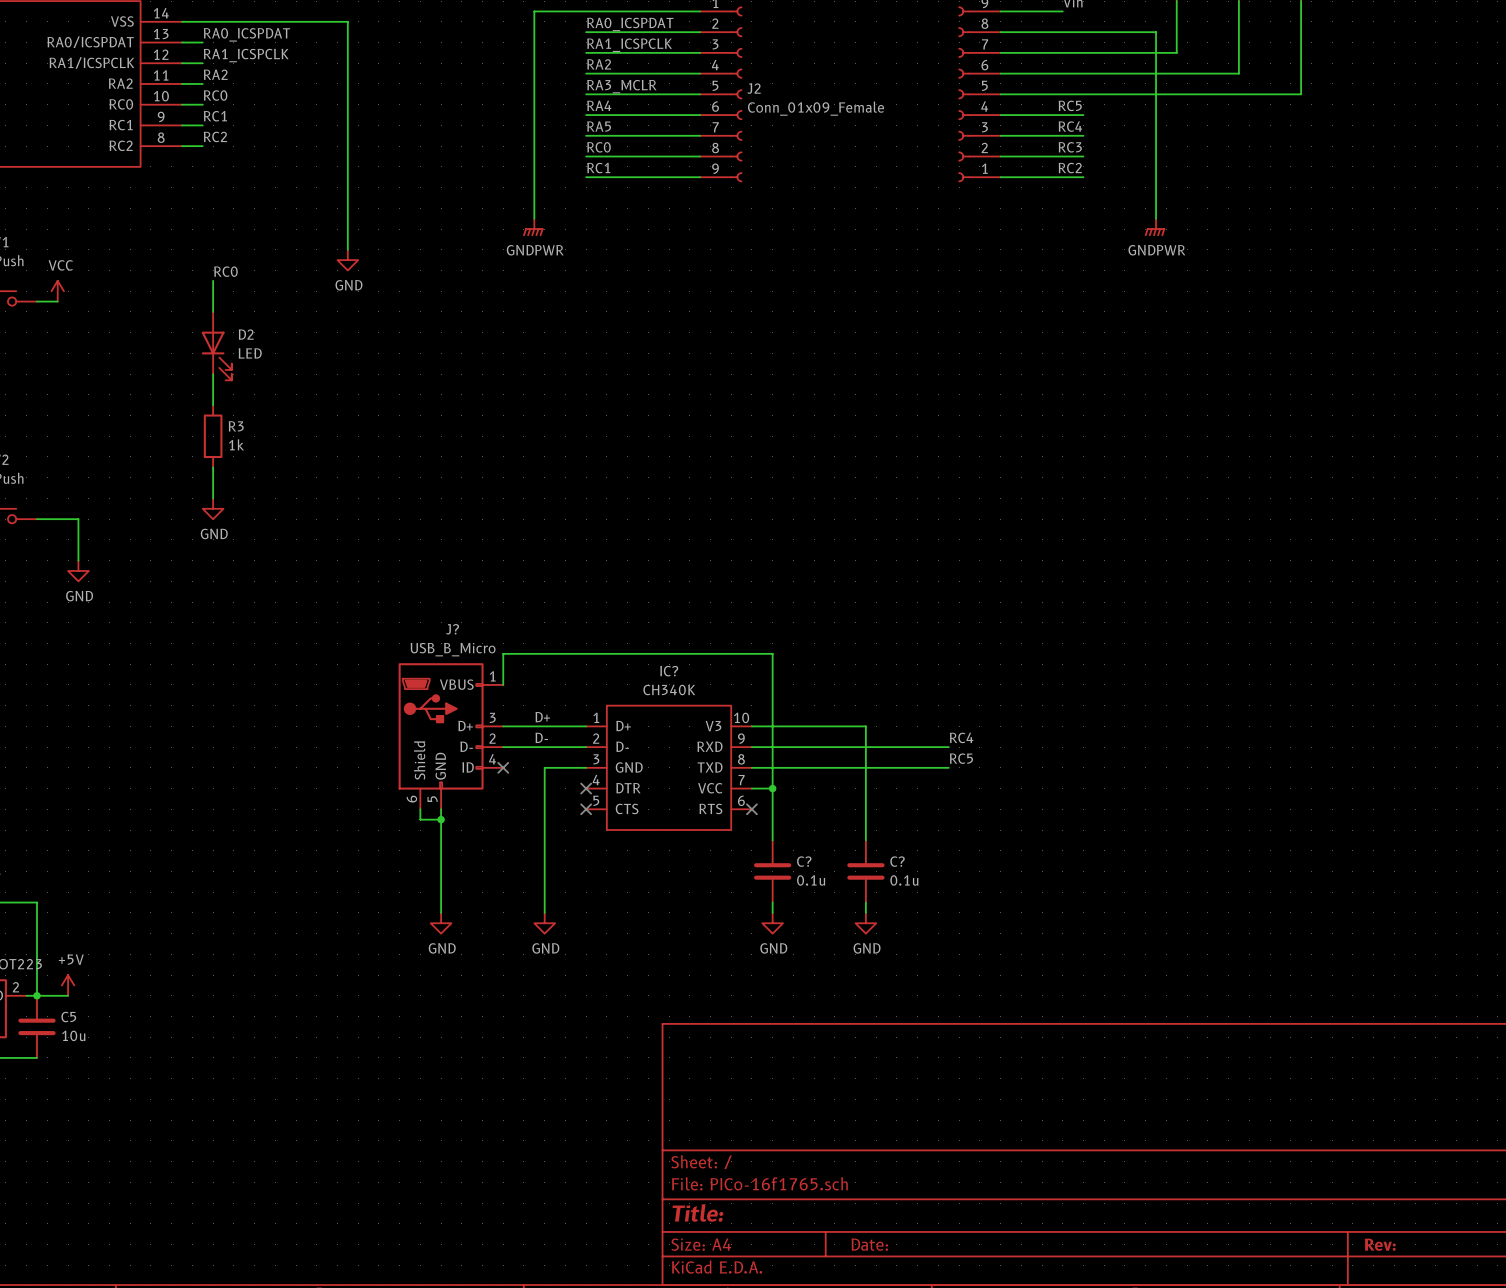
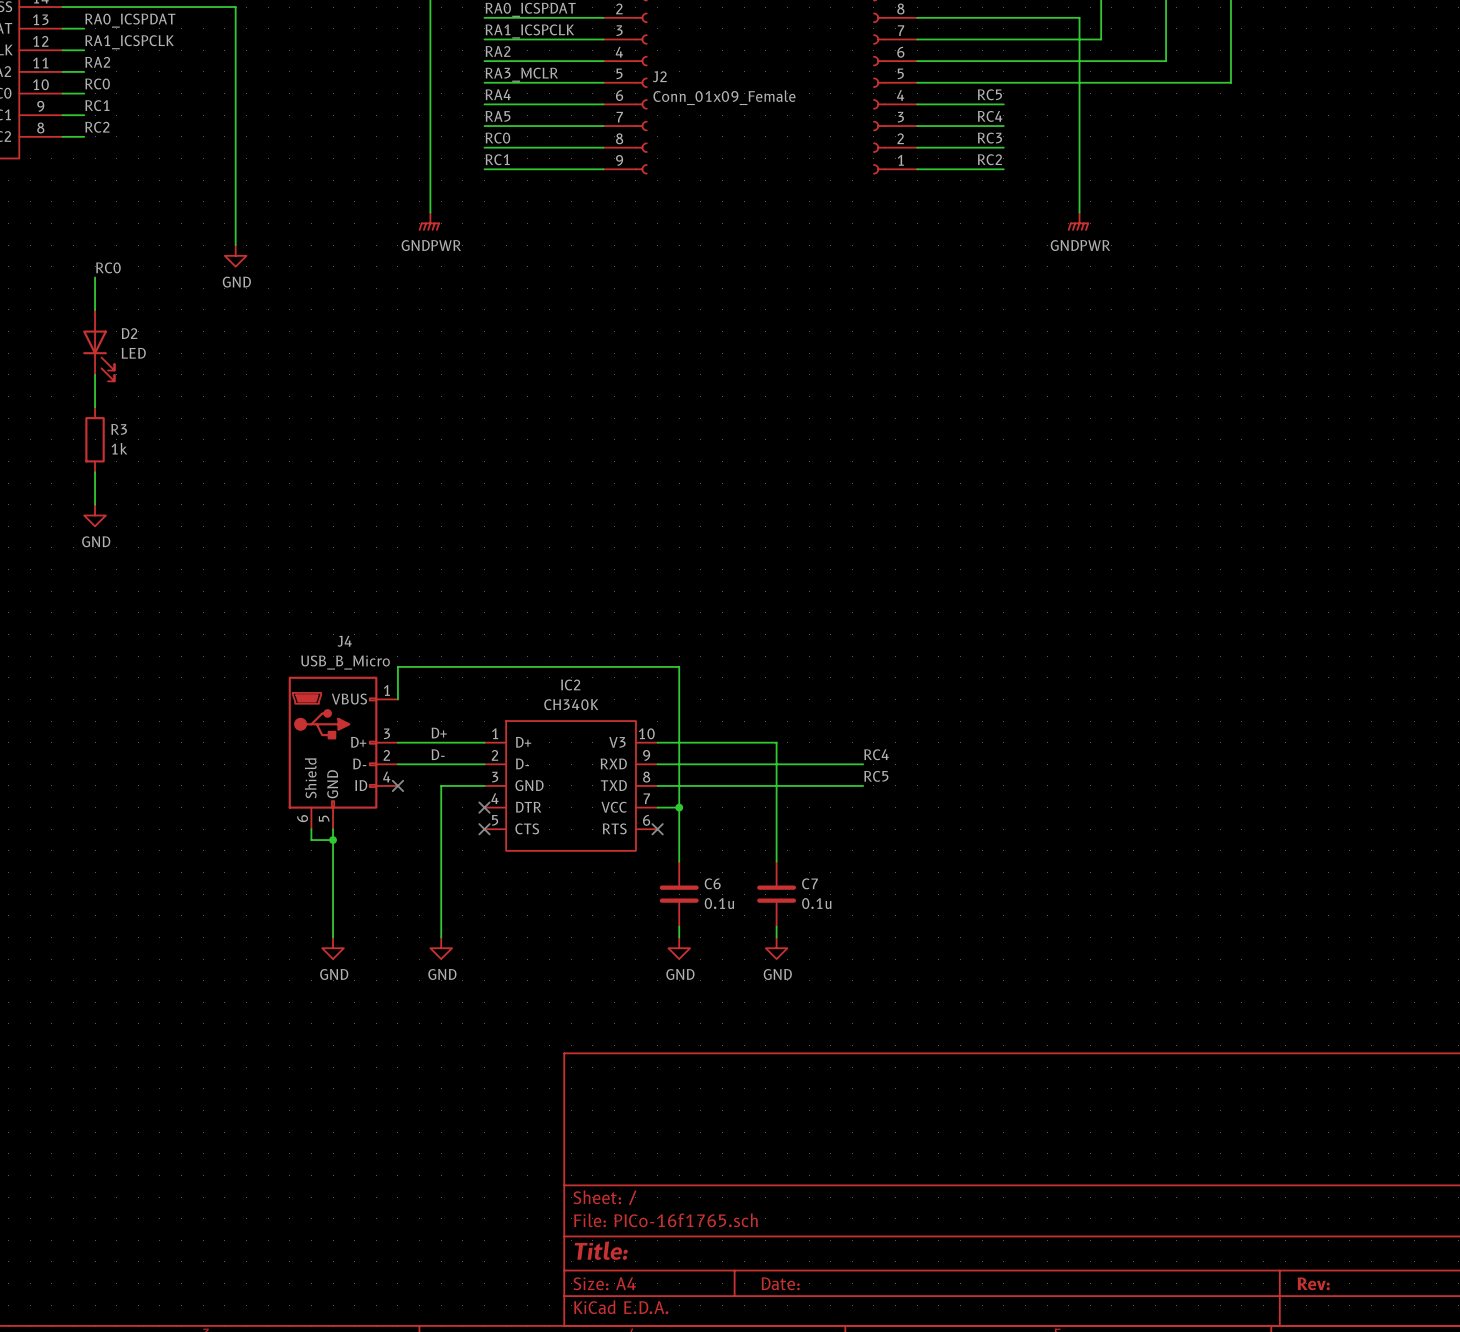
J? name: J? (452, 629) -> J4 (344, 641)
IC? name: IC? (669, 671) -> IC2 (570, 685)
C? name: C? (804, 861) -> C6 (712, 883)
C? name: C? (897, 861) -> C7 (809, 883)

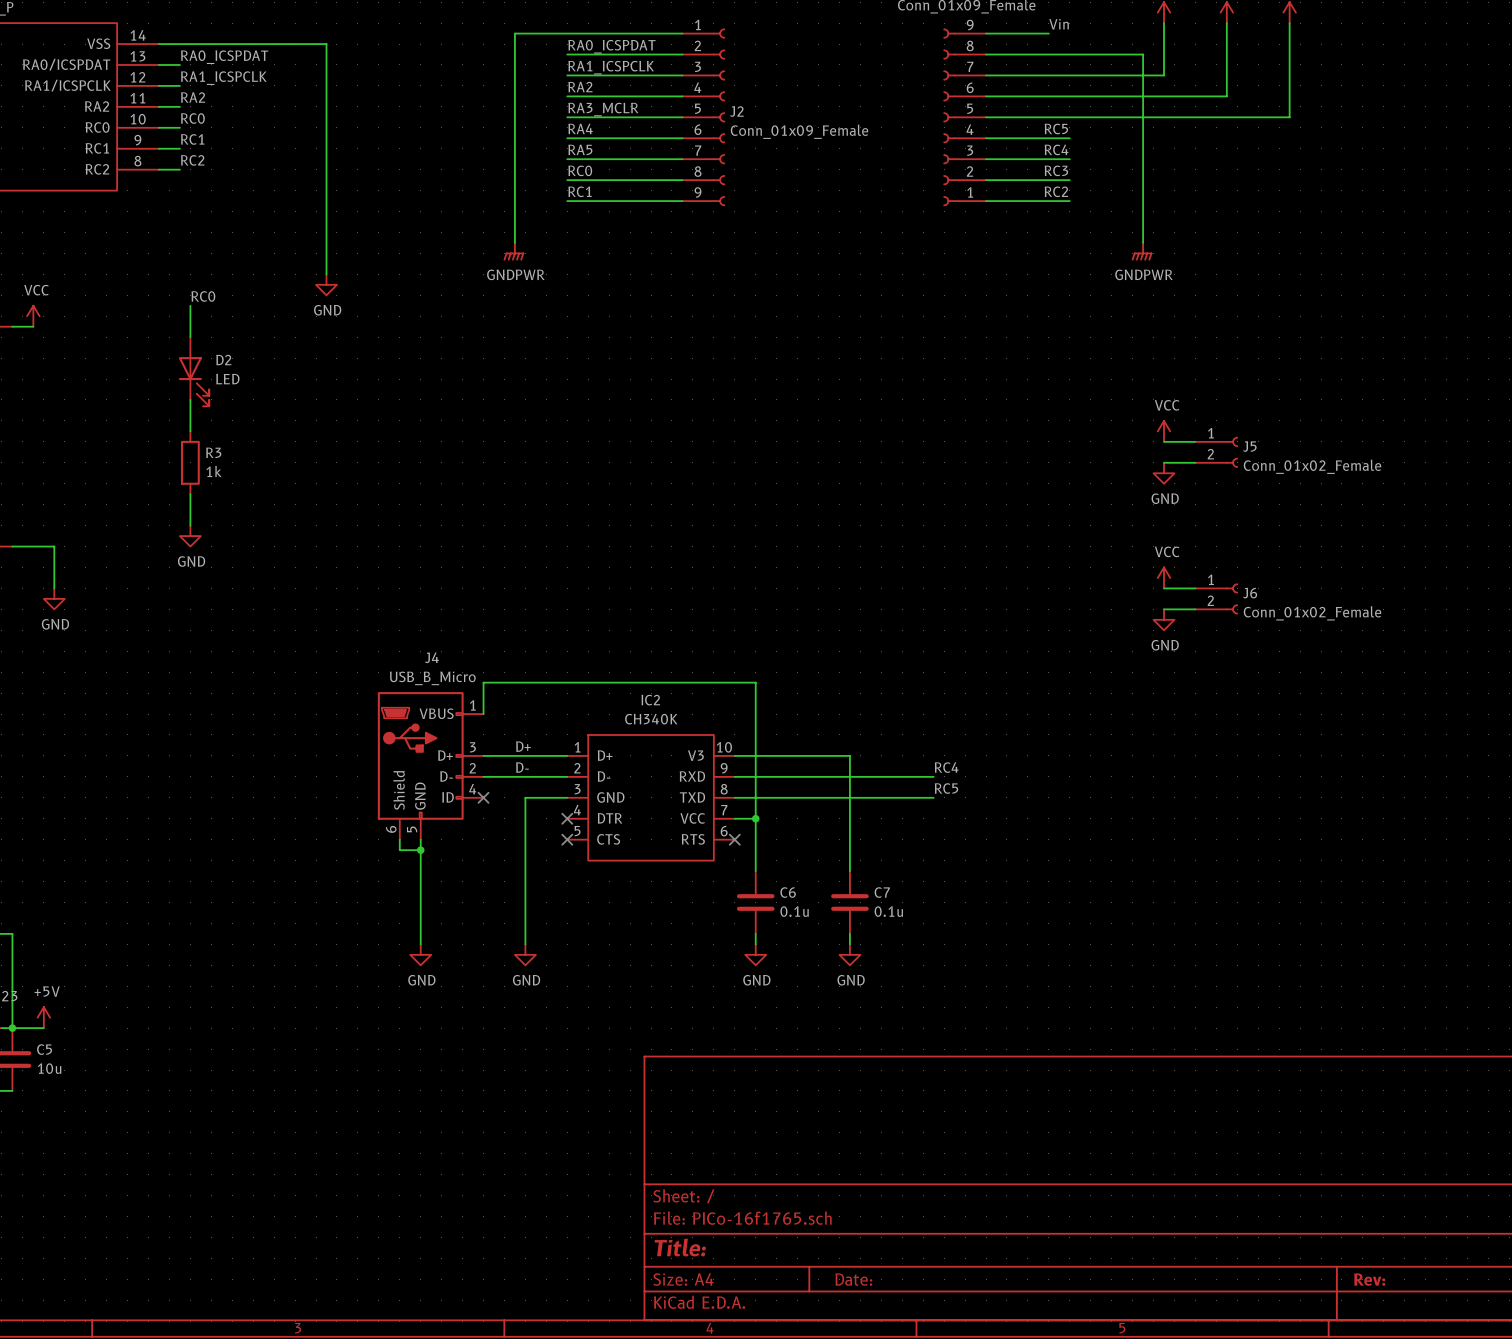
power symbol: none -> VCC (1164, 431)
wire: none -> (1164, 441) (1195, 441)
J5: none -> Conn_01x02_Female (1216, 452)
wire: none -> (1164, 462) (1195, 462)
power symbol: none -> GND (1164, 473)
power symbol: none -> VCC (1164, 577)
wire: none -> (1164, 588) (1195, 588)
J6: none -> Conn_01x02_Female (1216, 598)
wire: none -> (1164, 609) (1195, 609)
power symbol: none -> GND (1164, 619)

